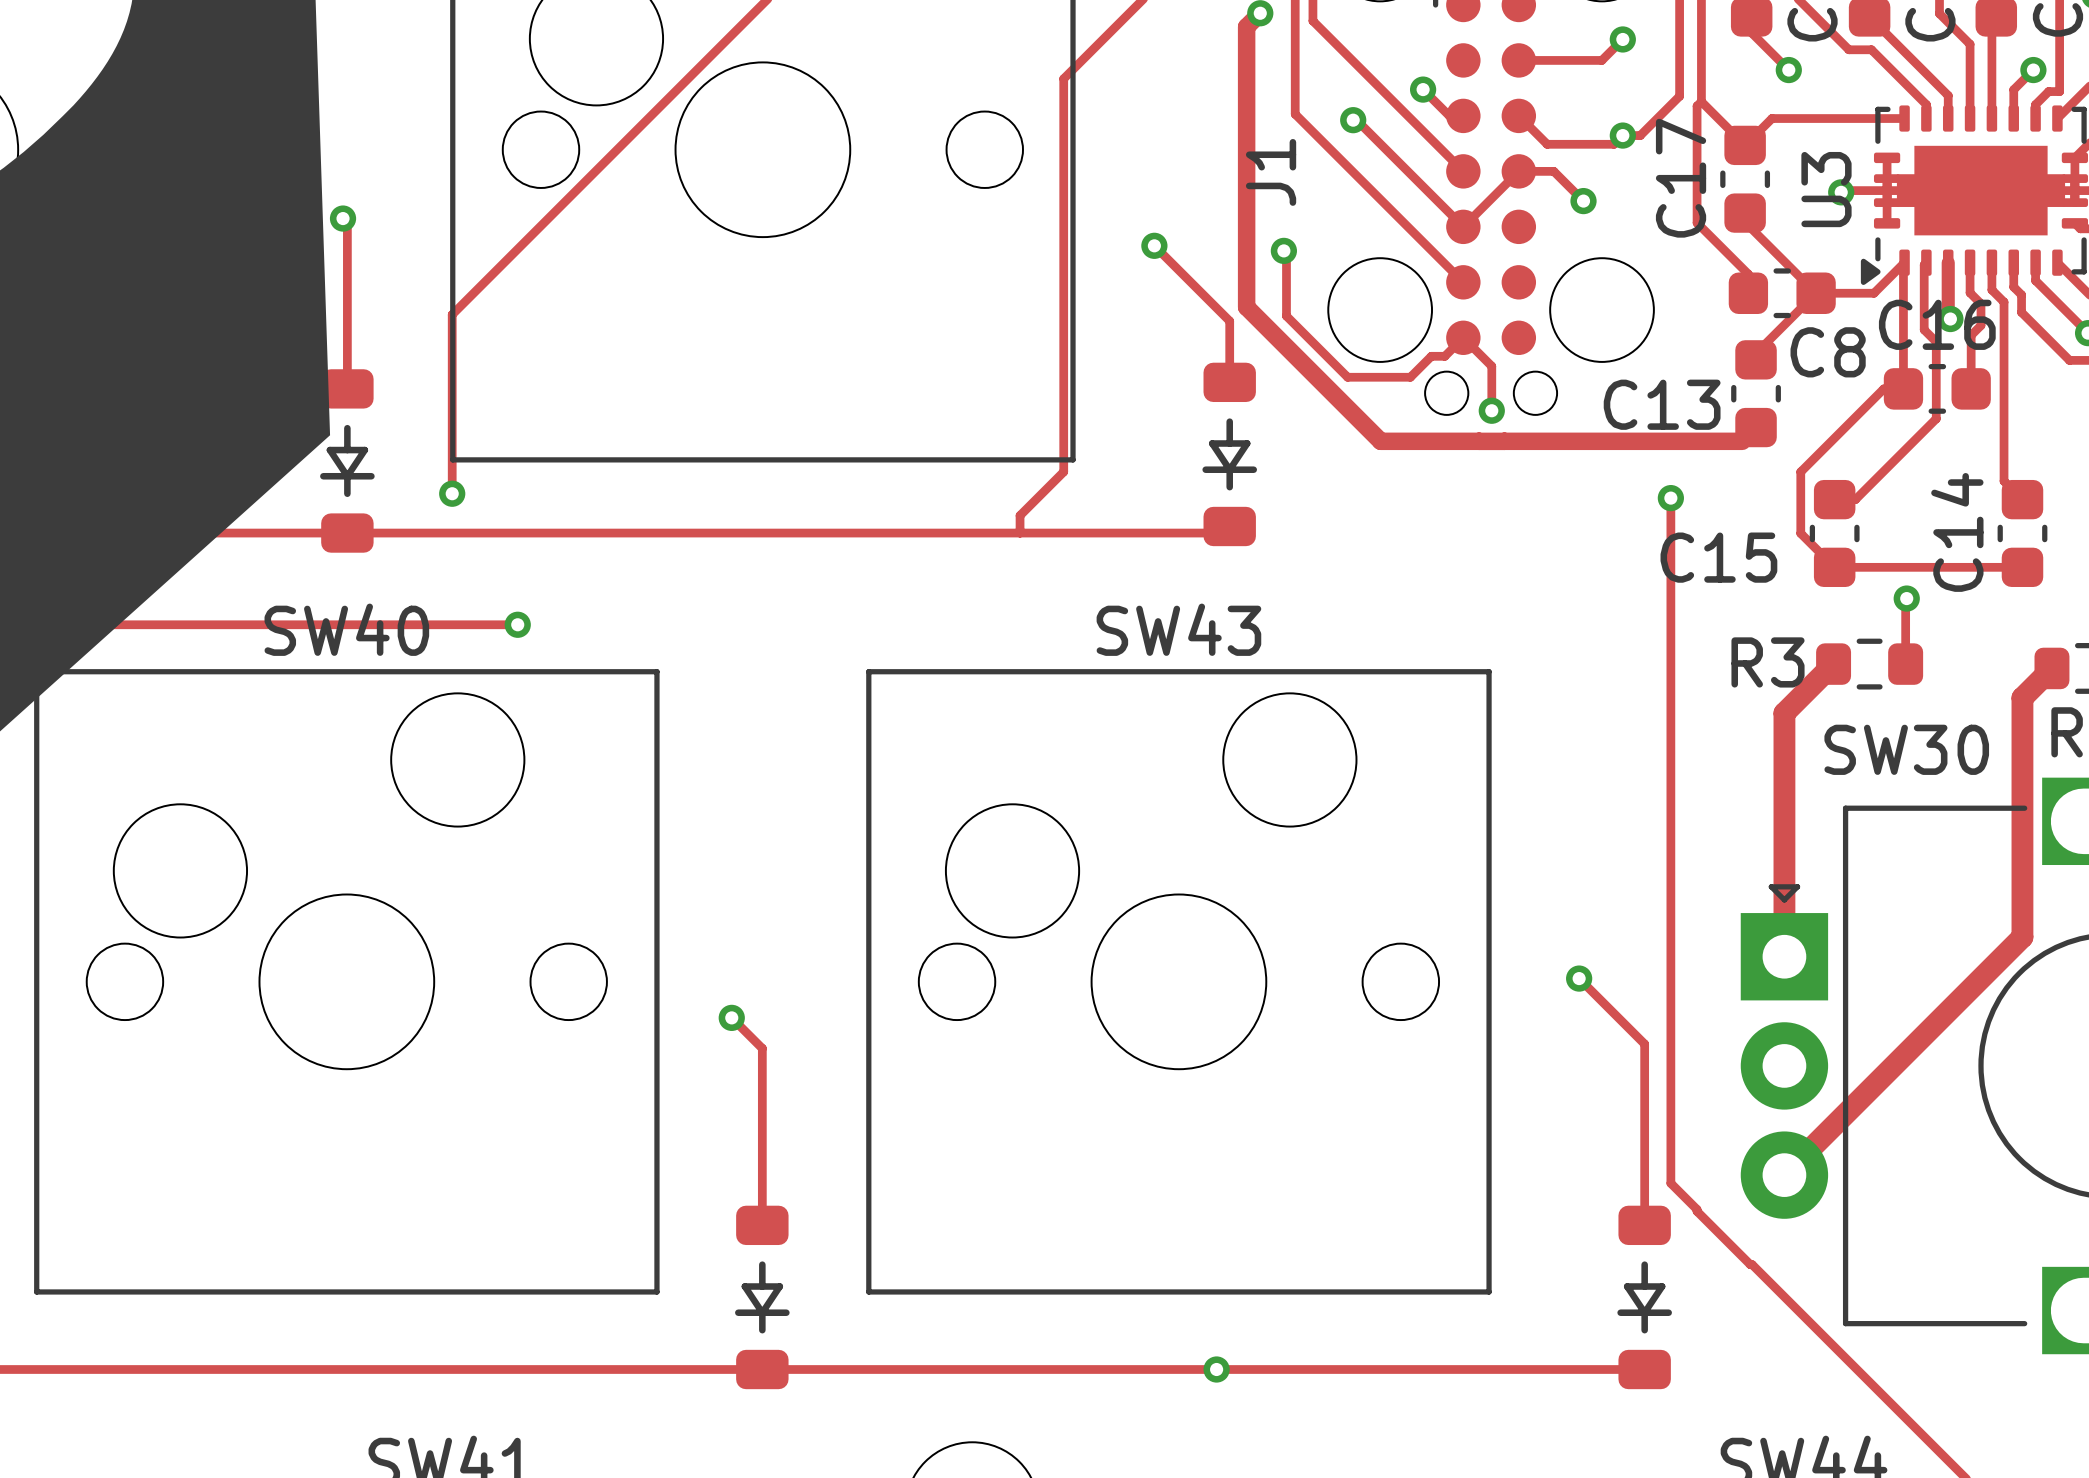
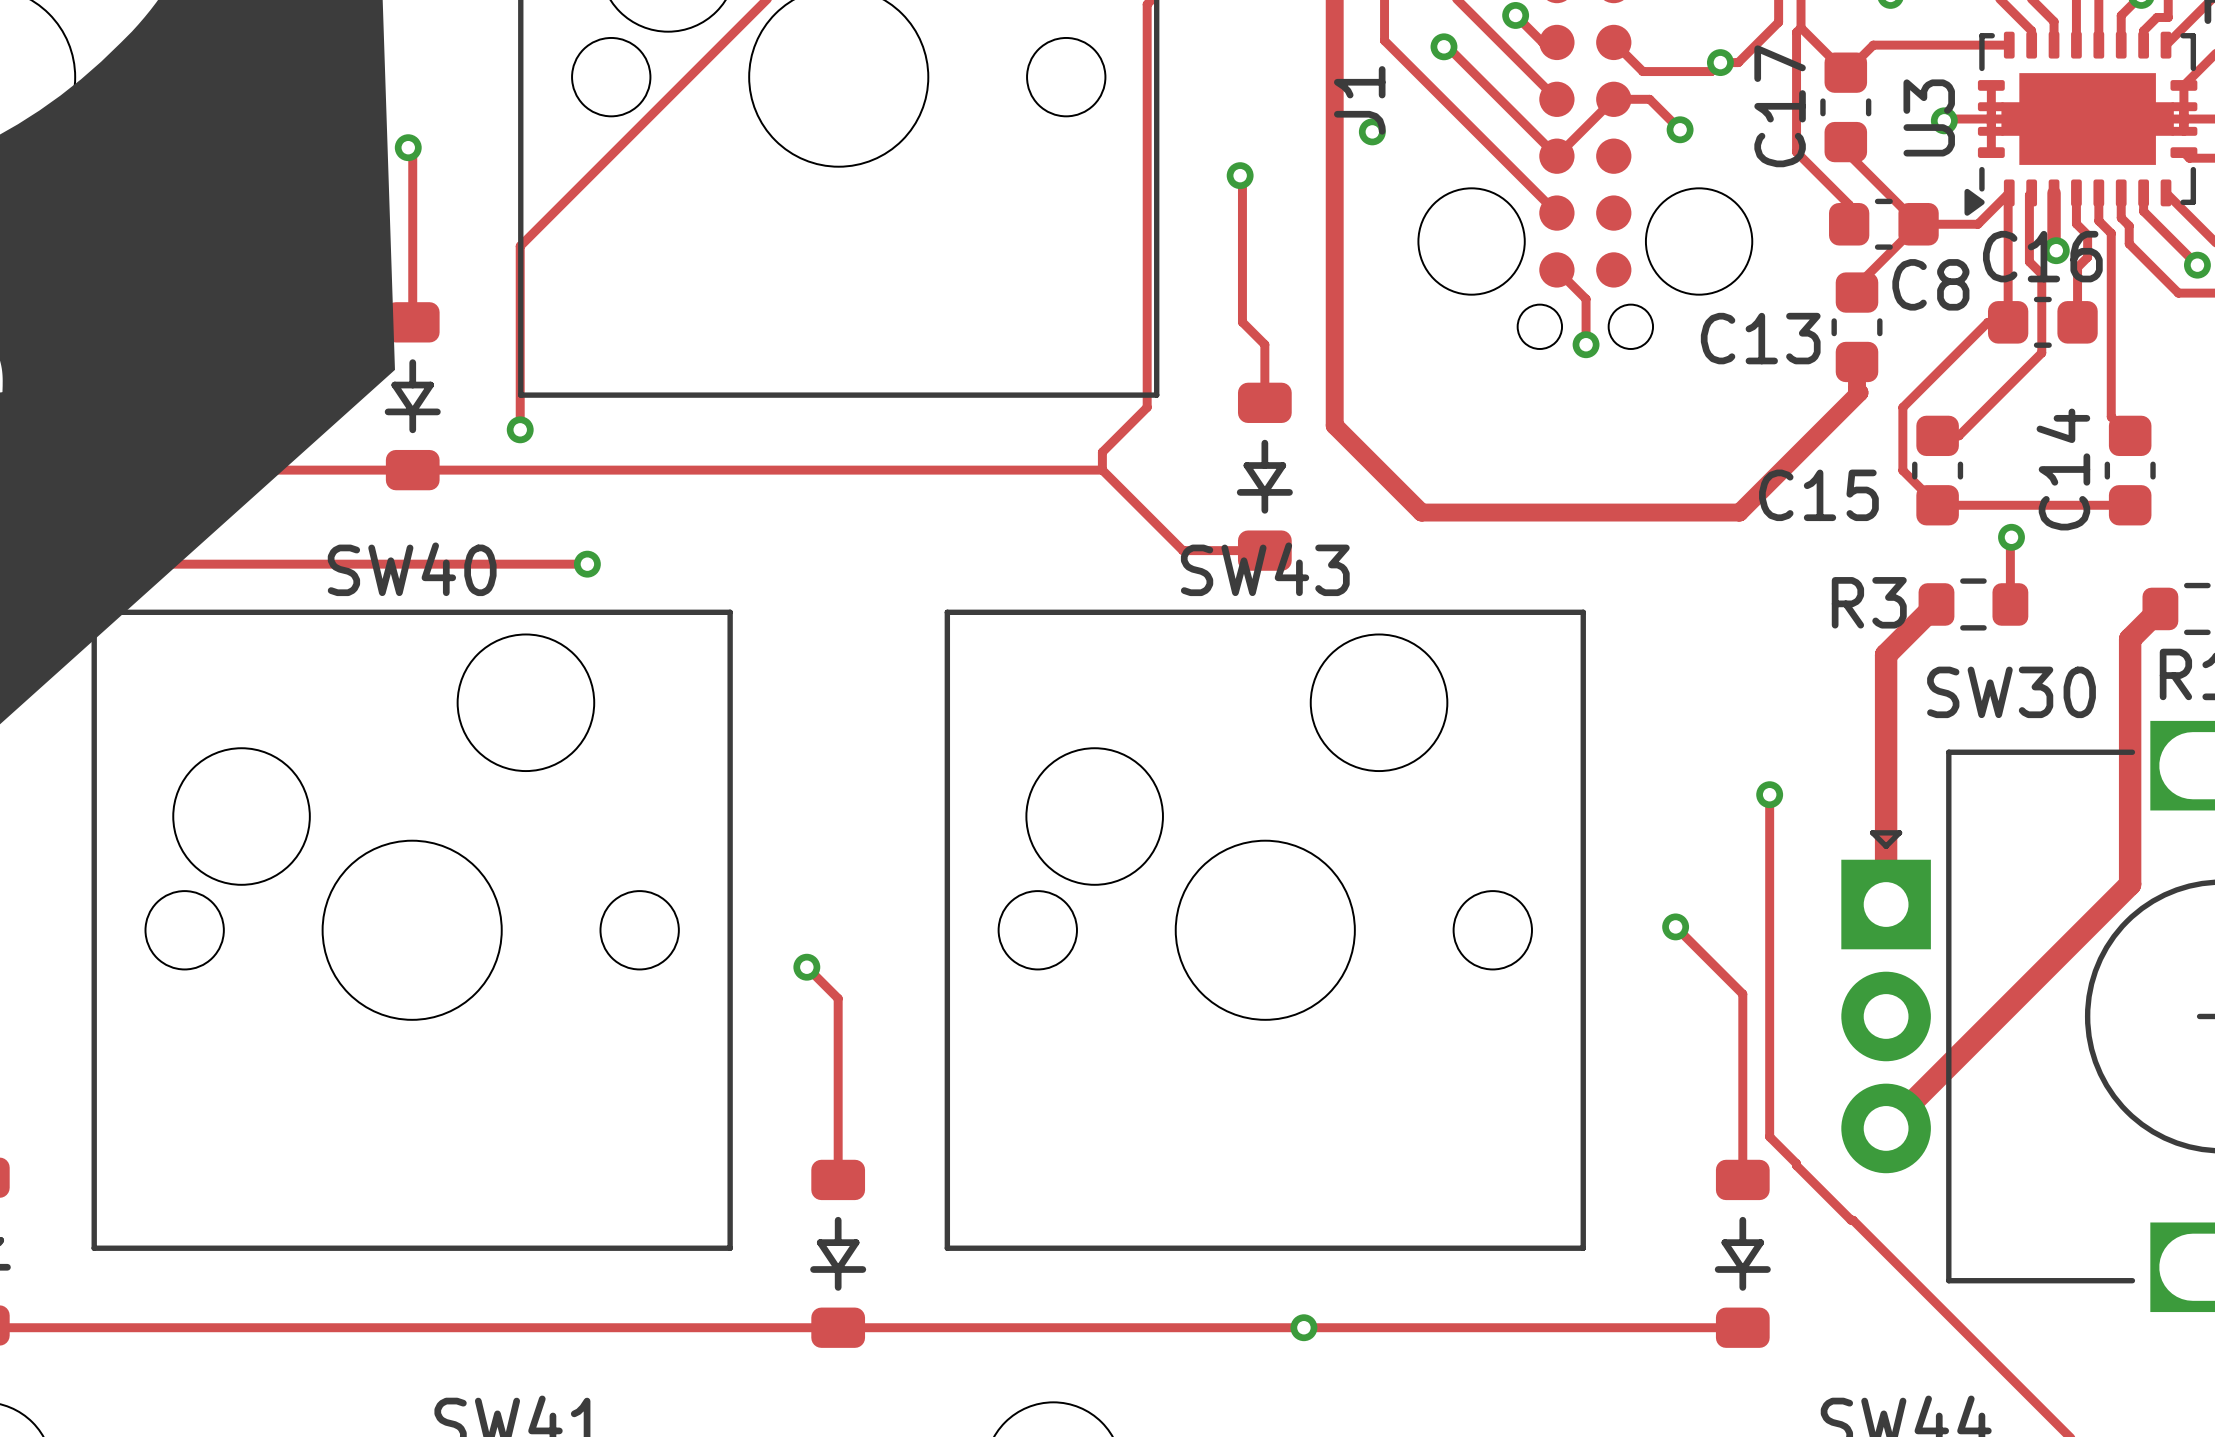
track: (1156, 248) (1229, 321) (1229, 382) -> (1242, 177) (1242, 322) (1264, 344) (1264, 402)
track: (1283, 250) (1286, 253) (1286, 316) (1347, 377) (1410, 377) (1431, 356) (1444, 356) (1463, 337) -> none
via position: (1283, 250) -> (1372, 131)
track: (1246, 307) (1380, 441) (1742, 441) -> (1334, 238) (1334, 425) (1421, 512) (1739, 512) (1859, 392) (1857, 390) (1857, 361)
part position: (1229, 454) -> (1264, 476)
track: (1670, 498) (1670, 849) -> none
via: (1670, 498) -> none
track: (1229, 526) (1223, 533) (1020, 533) -> (1264, 550) (1182, 550) (1102, 470)
via: none -> (1769, 794)

